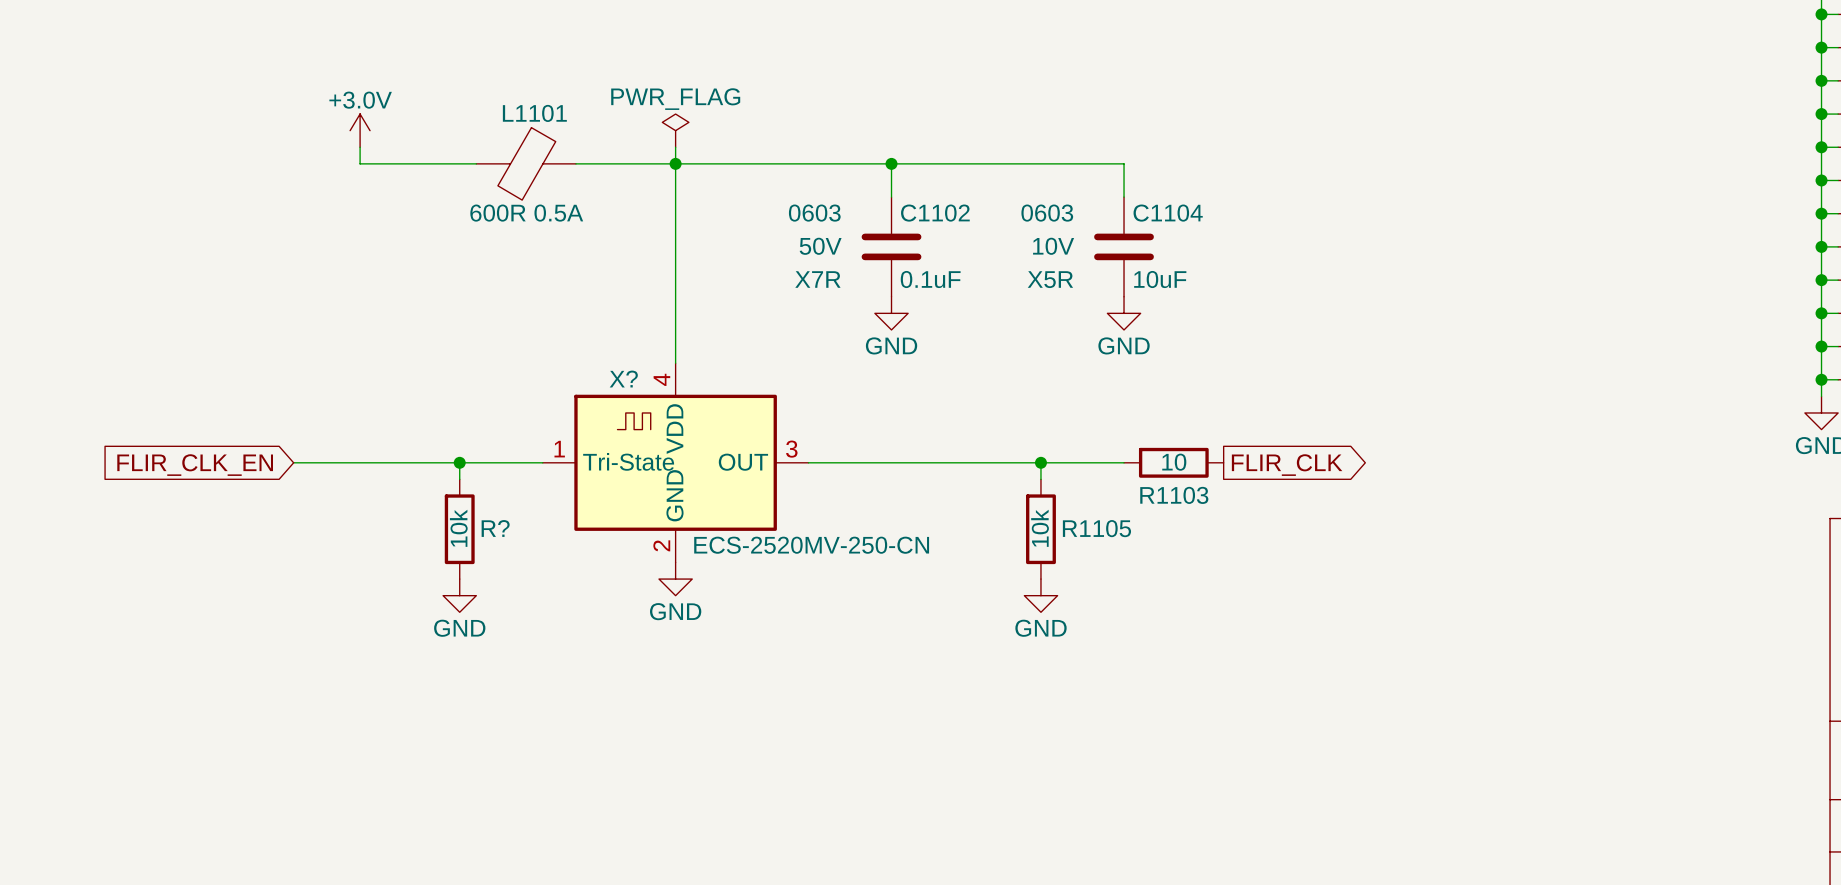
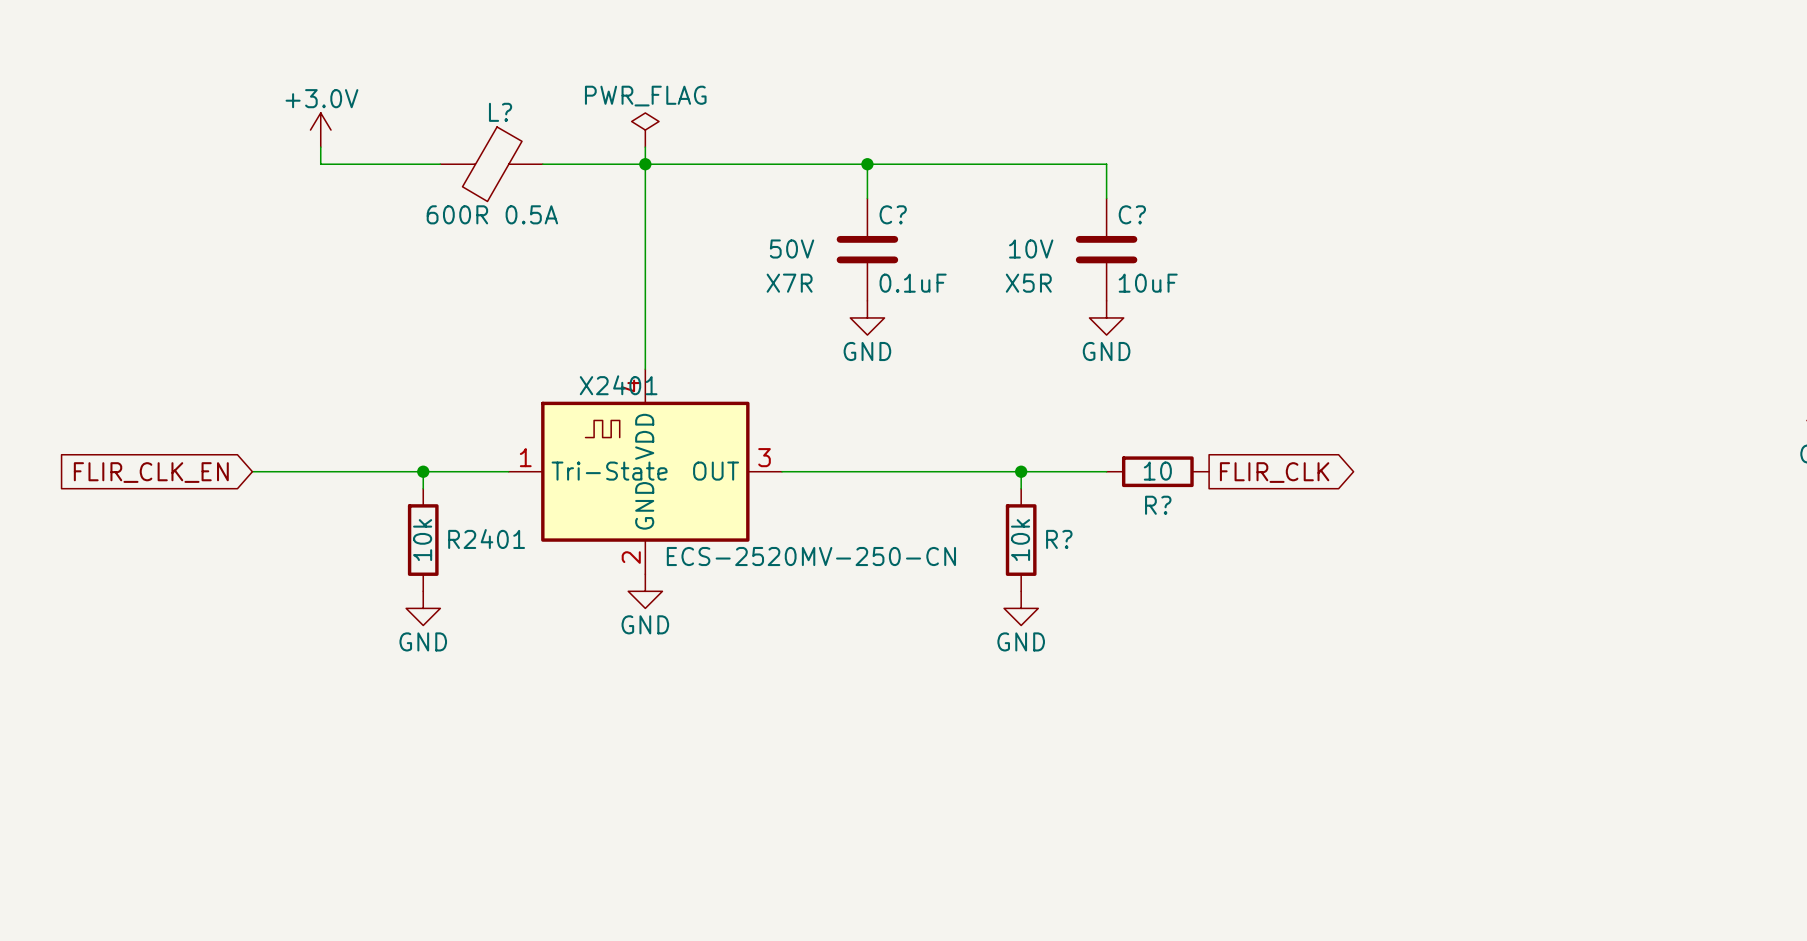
L1101 name: L1101 (534, 113) -> L? (500, 112)
C1102 text: 0603 (814, 213) -> none
C1102 name: C1102 (935, 213) -> C? (893, 214)
C1104 text: 0603 (1047, 213) -> none
C1104 name: C1104 (1168, 213) -> C? (1132, 214)
X? name: X? (623, 379) -> X2401 (618, 385)
R1103 name: R1103 (1174, 495) -> R? (1158, 505)
R? name: R? (495, 528) -> R2401 (486, 539)
R1105 name: R1105 (1096, 528) -> R? (1059, 539)

